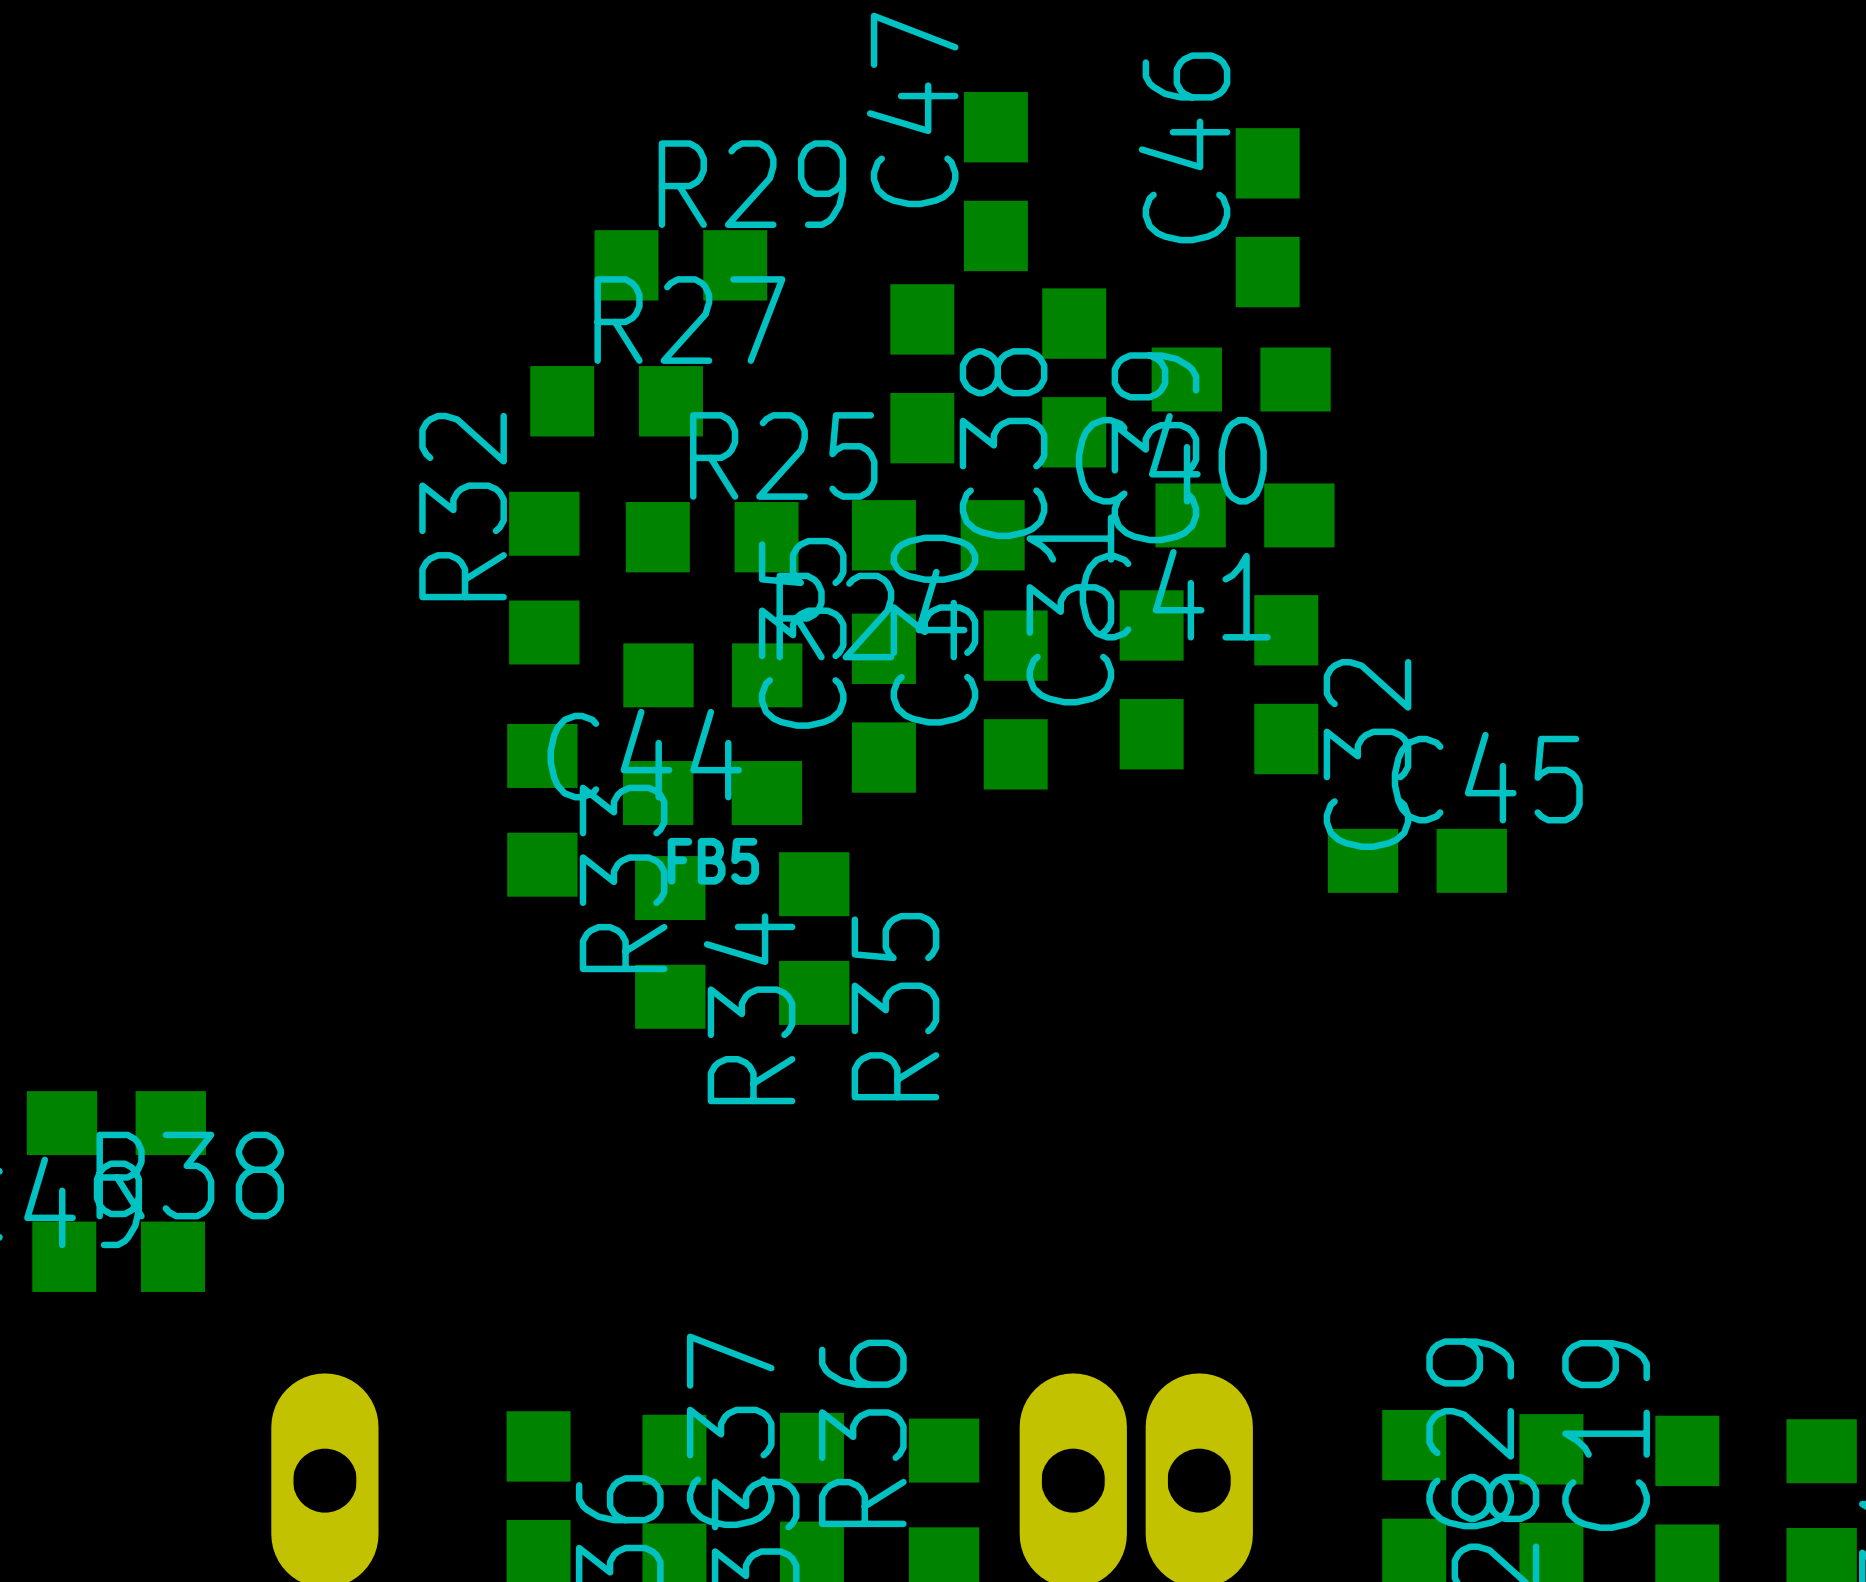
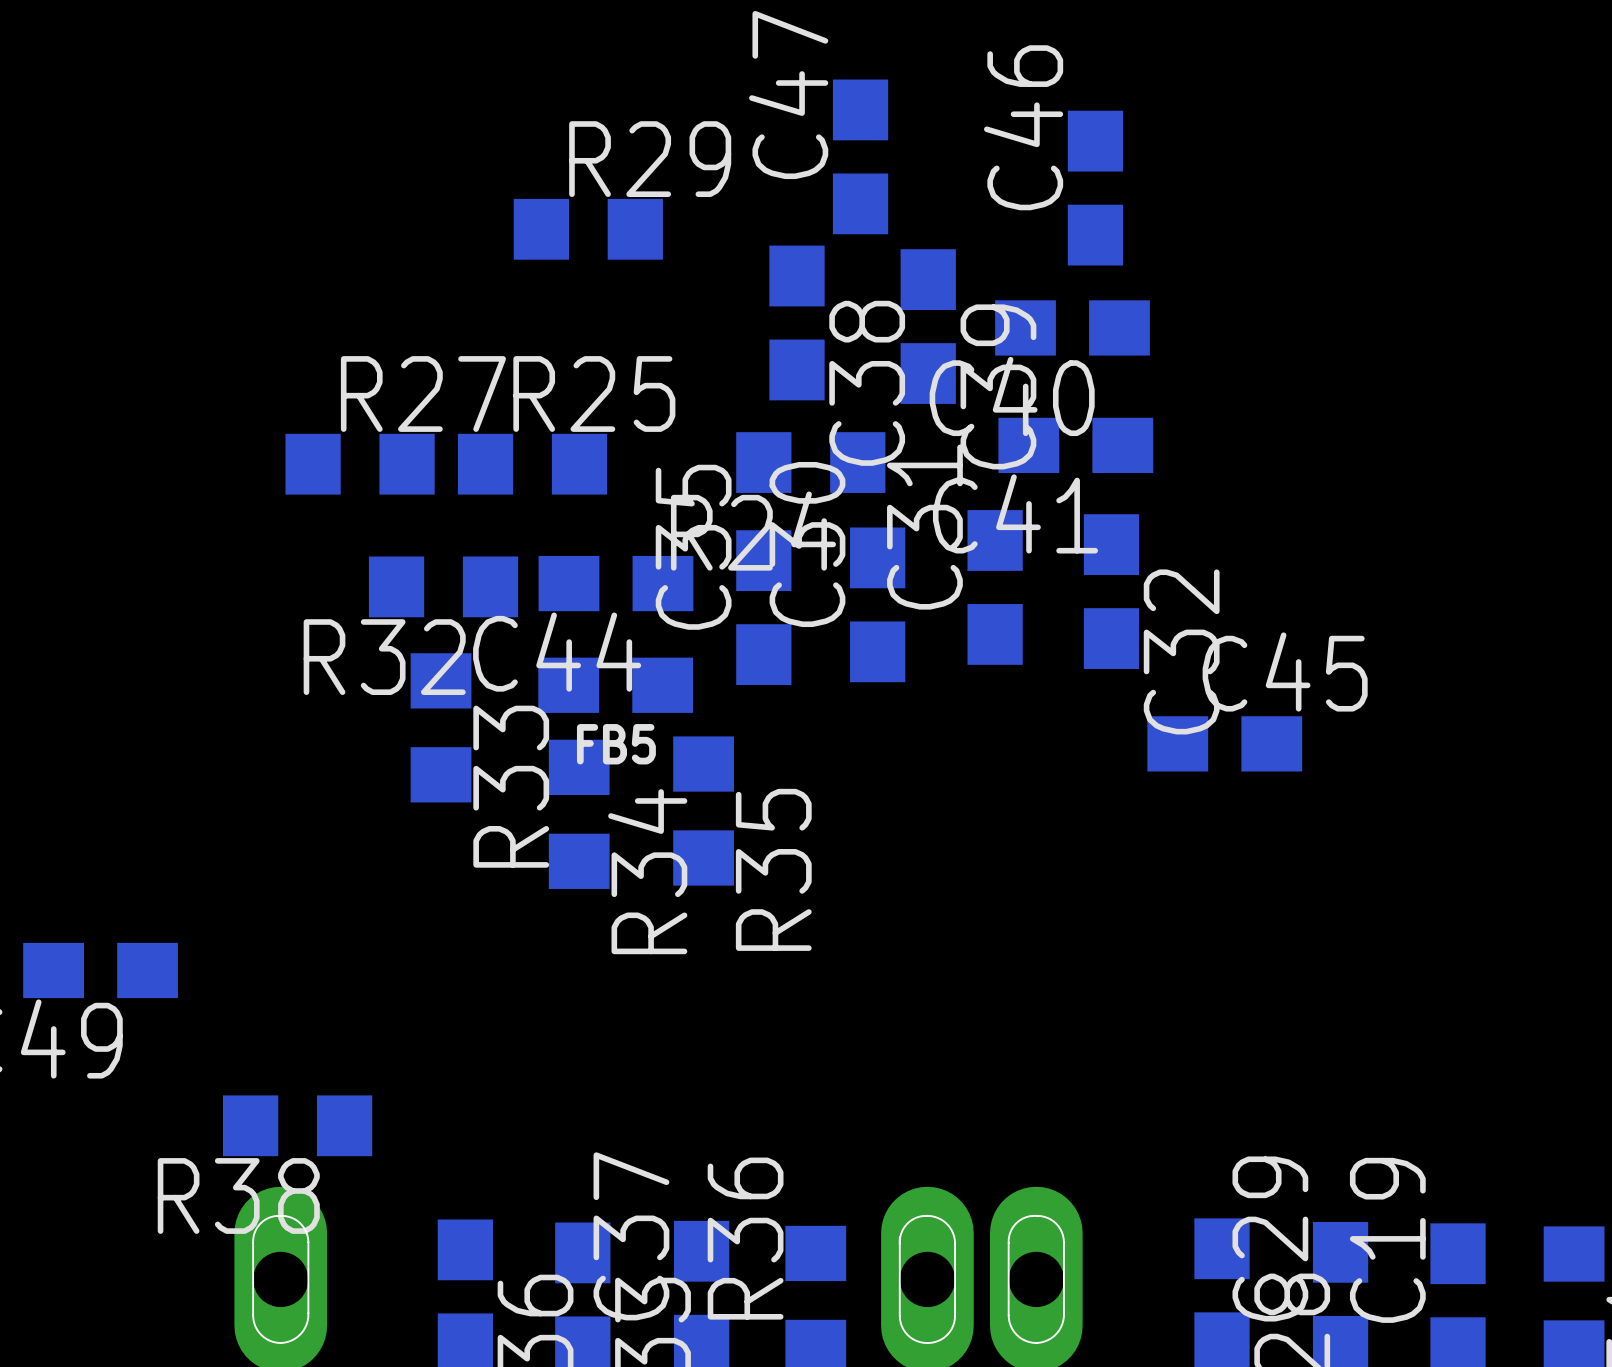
R27 position: (616, 401) -> (360, 464)
R32 name position: R32 (463, 506) -> R32 (384, 657)
R25 position: (712, 537) -> (532, 464)
R32 rotation: 0° (544, 578) -> 90° clockwise (443, 586)
R32 position: (544, 578) -> (443, 586)
R33 position: (542, 810) -> (441, 727)
R38 name position: R38 (190, 1175) -> R38 (238, 1195)
R38 position: (118, 1256) -> (297, 1125)

